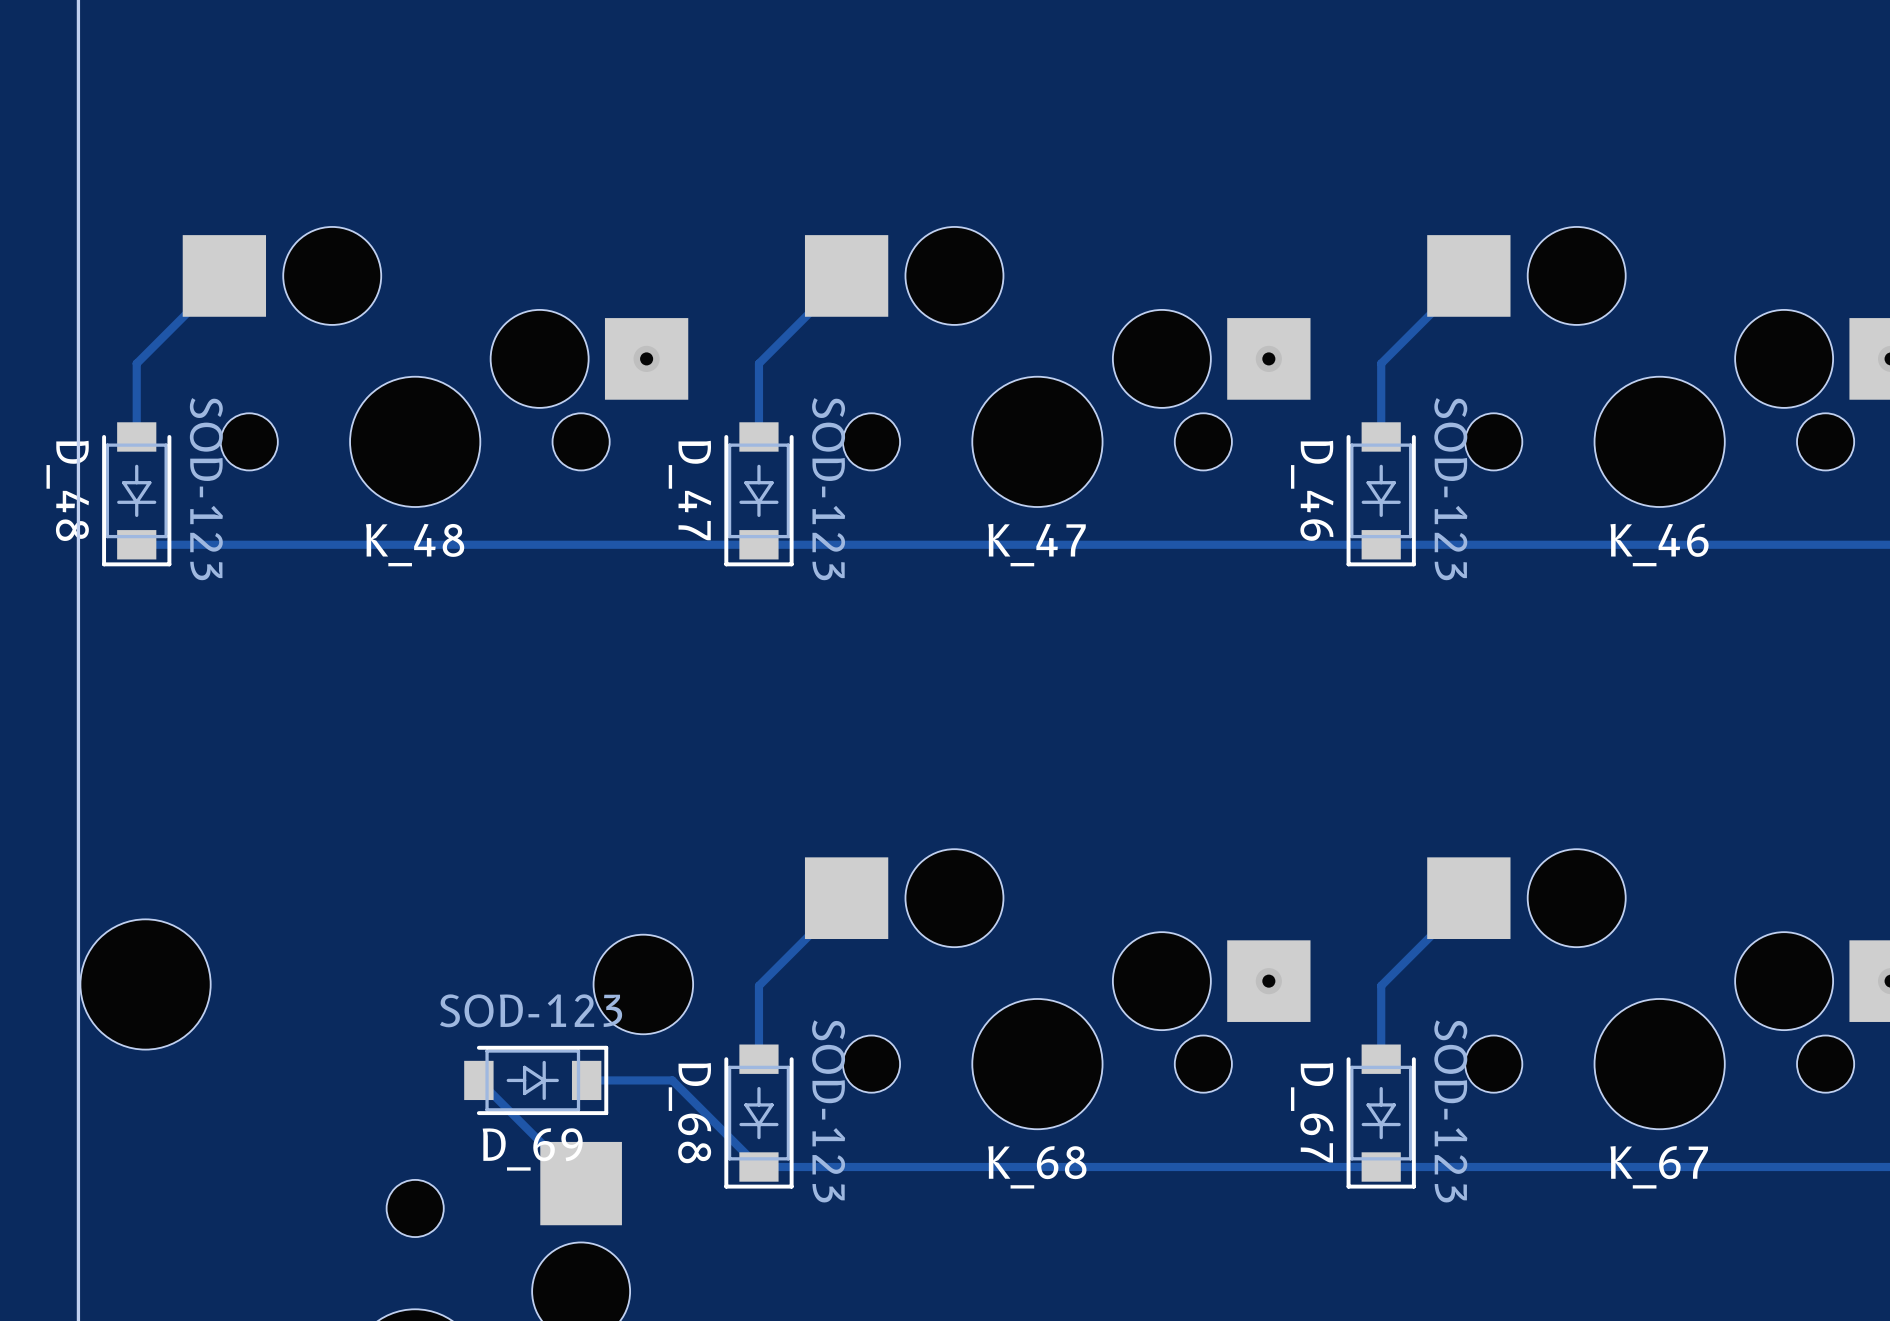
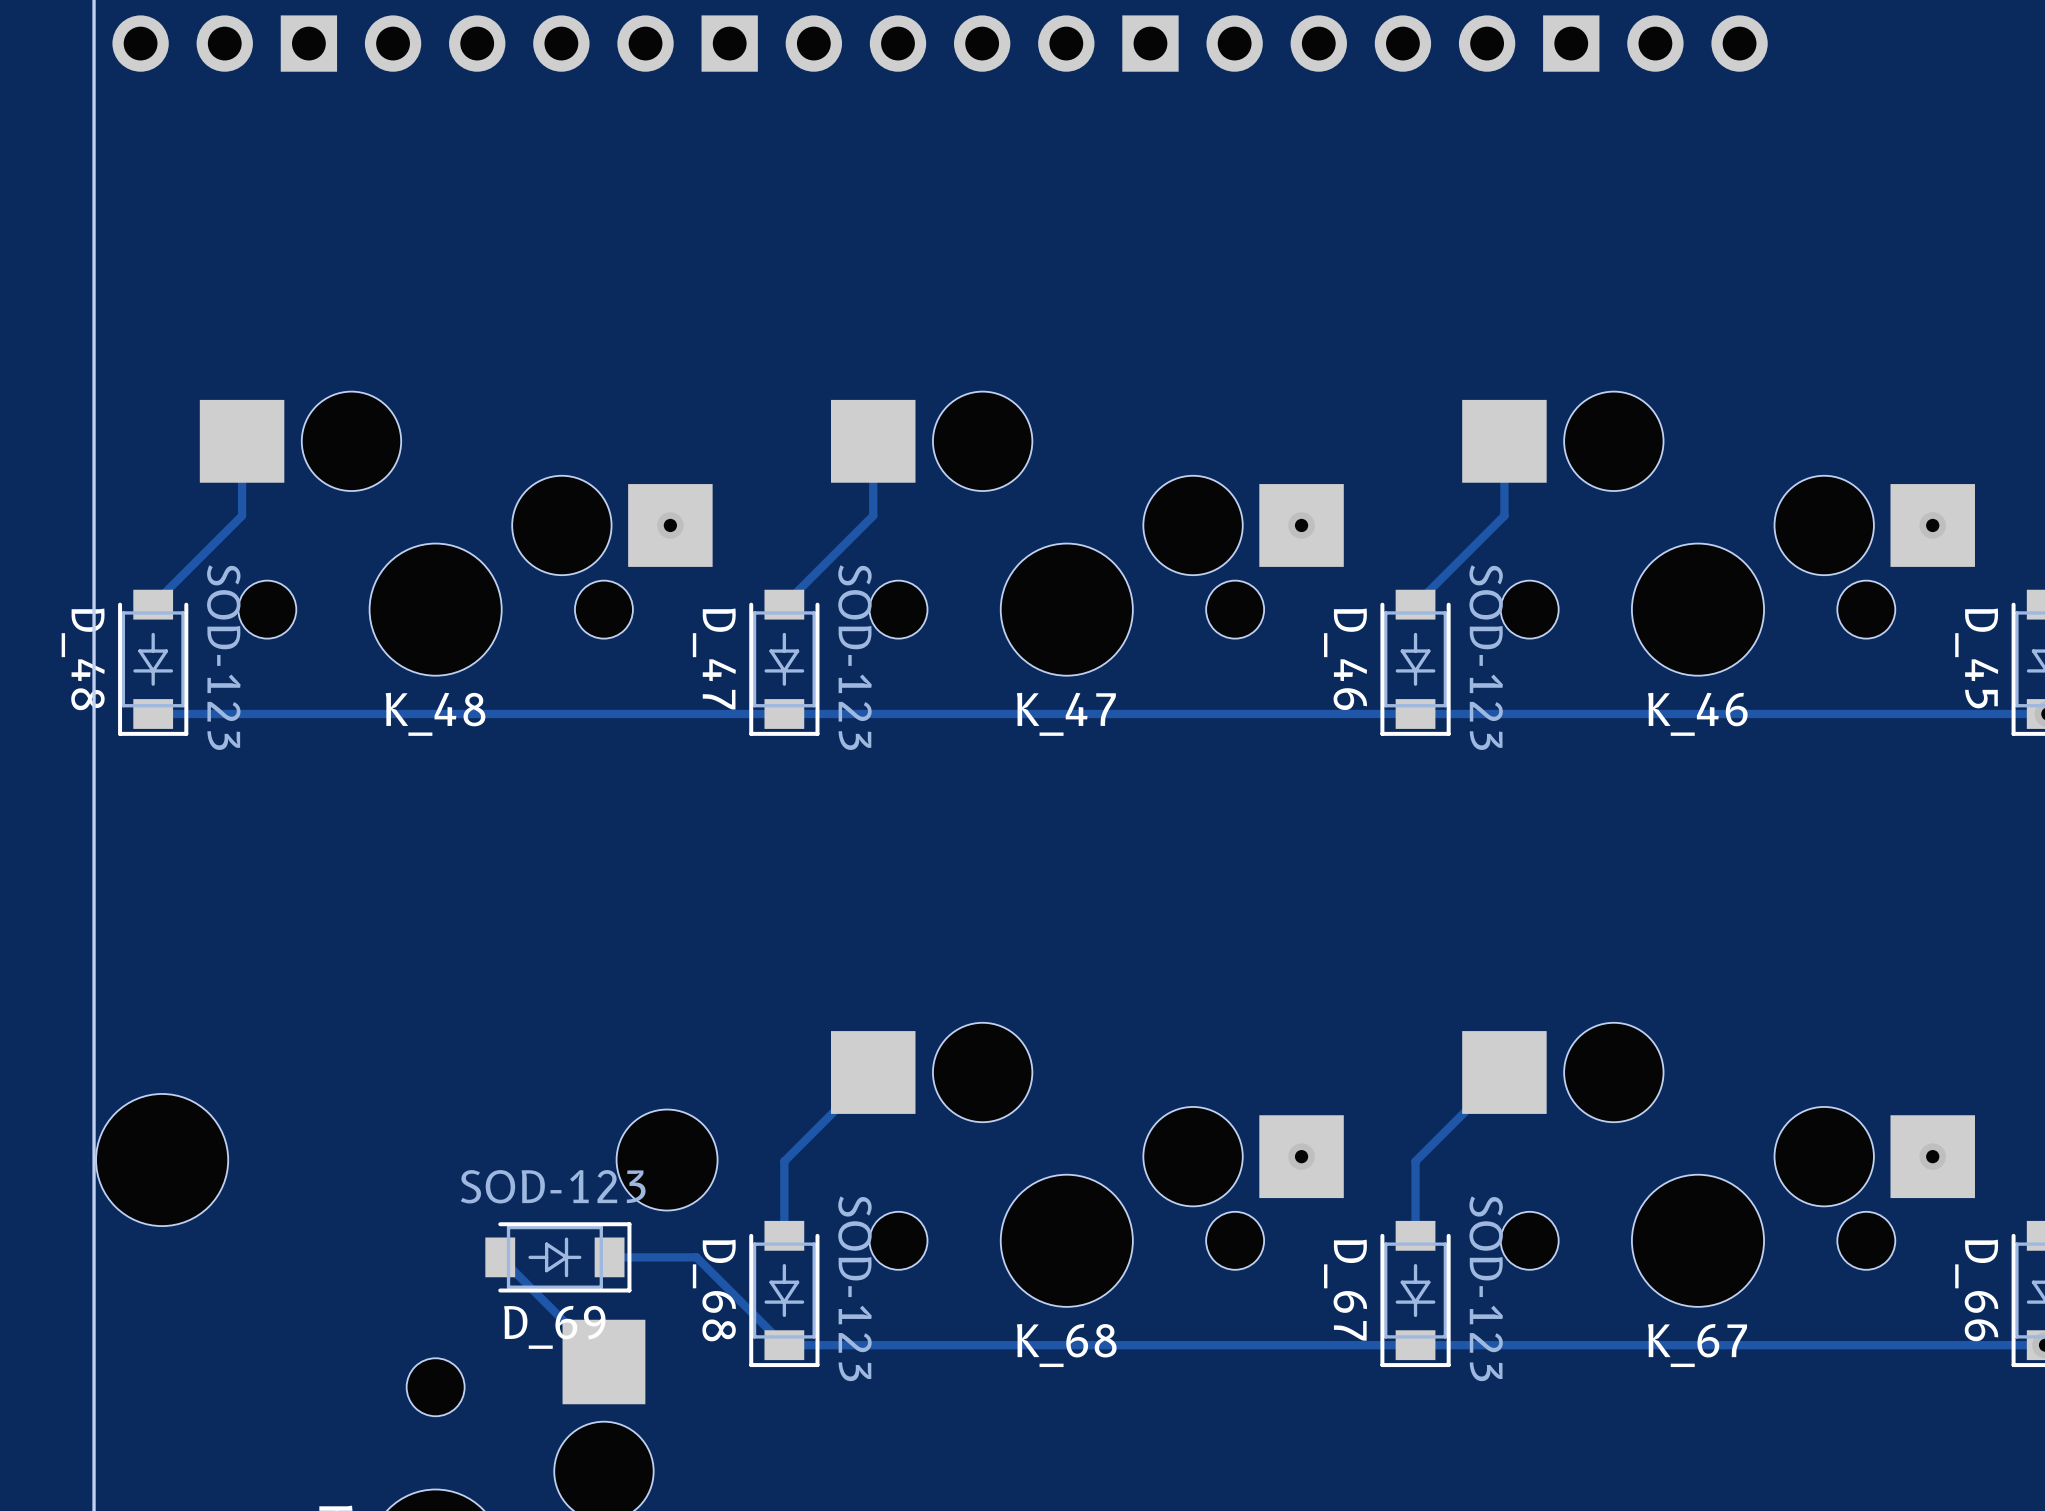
track: (224, 275) (136, 363) -> (242, 441) (242, 515) (153, 604)
track: (846, 275) (758, 363) (758, 436) -> (873, 441) (873, 515) (784, 604)
track: (1468, 275) (1381, 363) (1381, 436) -> (1504, 441) (1504, 515) (1415, 604)
track: (136, 363) (136, 436) -> none

